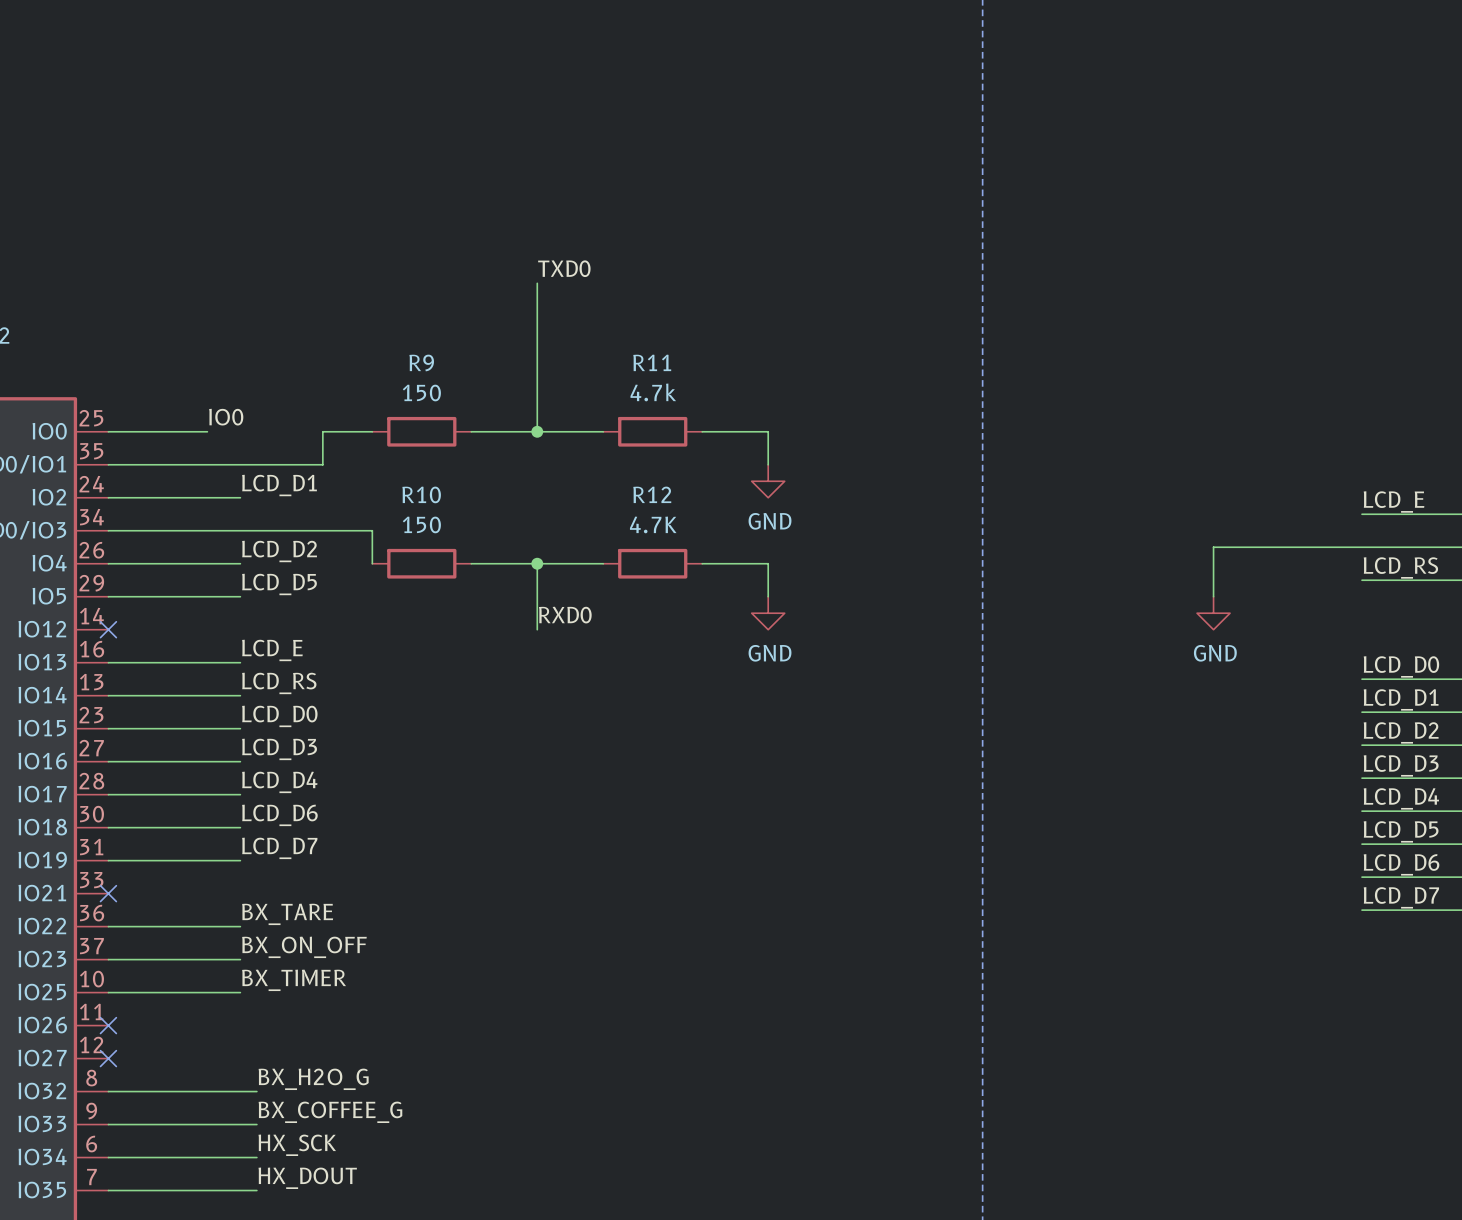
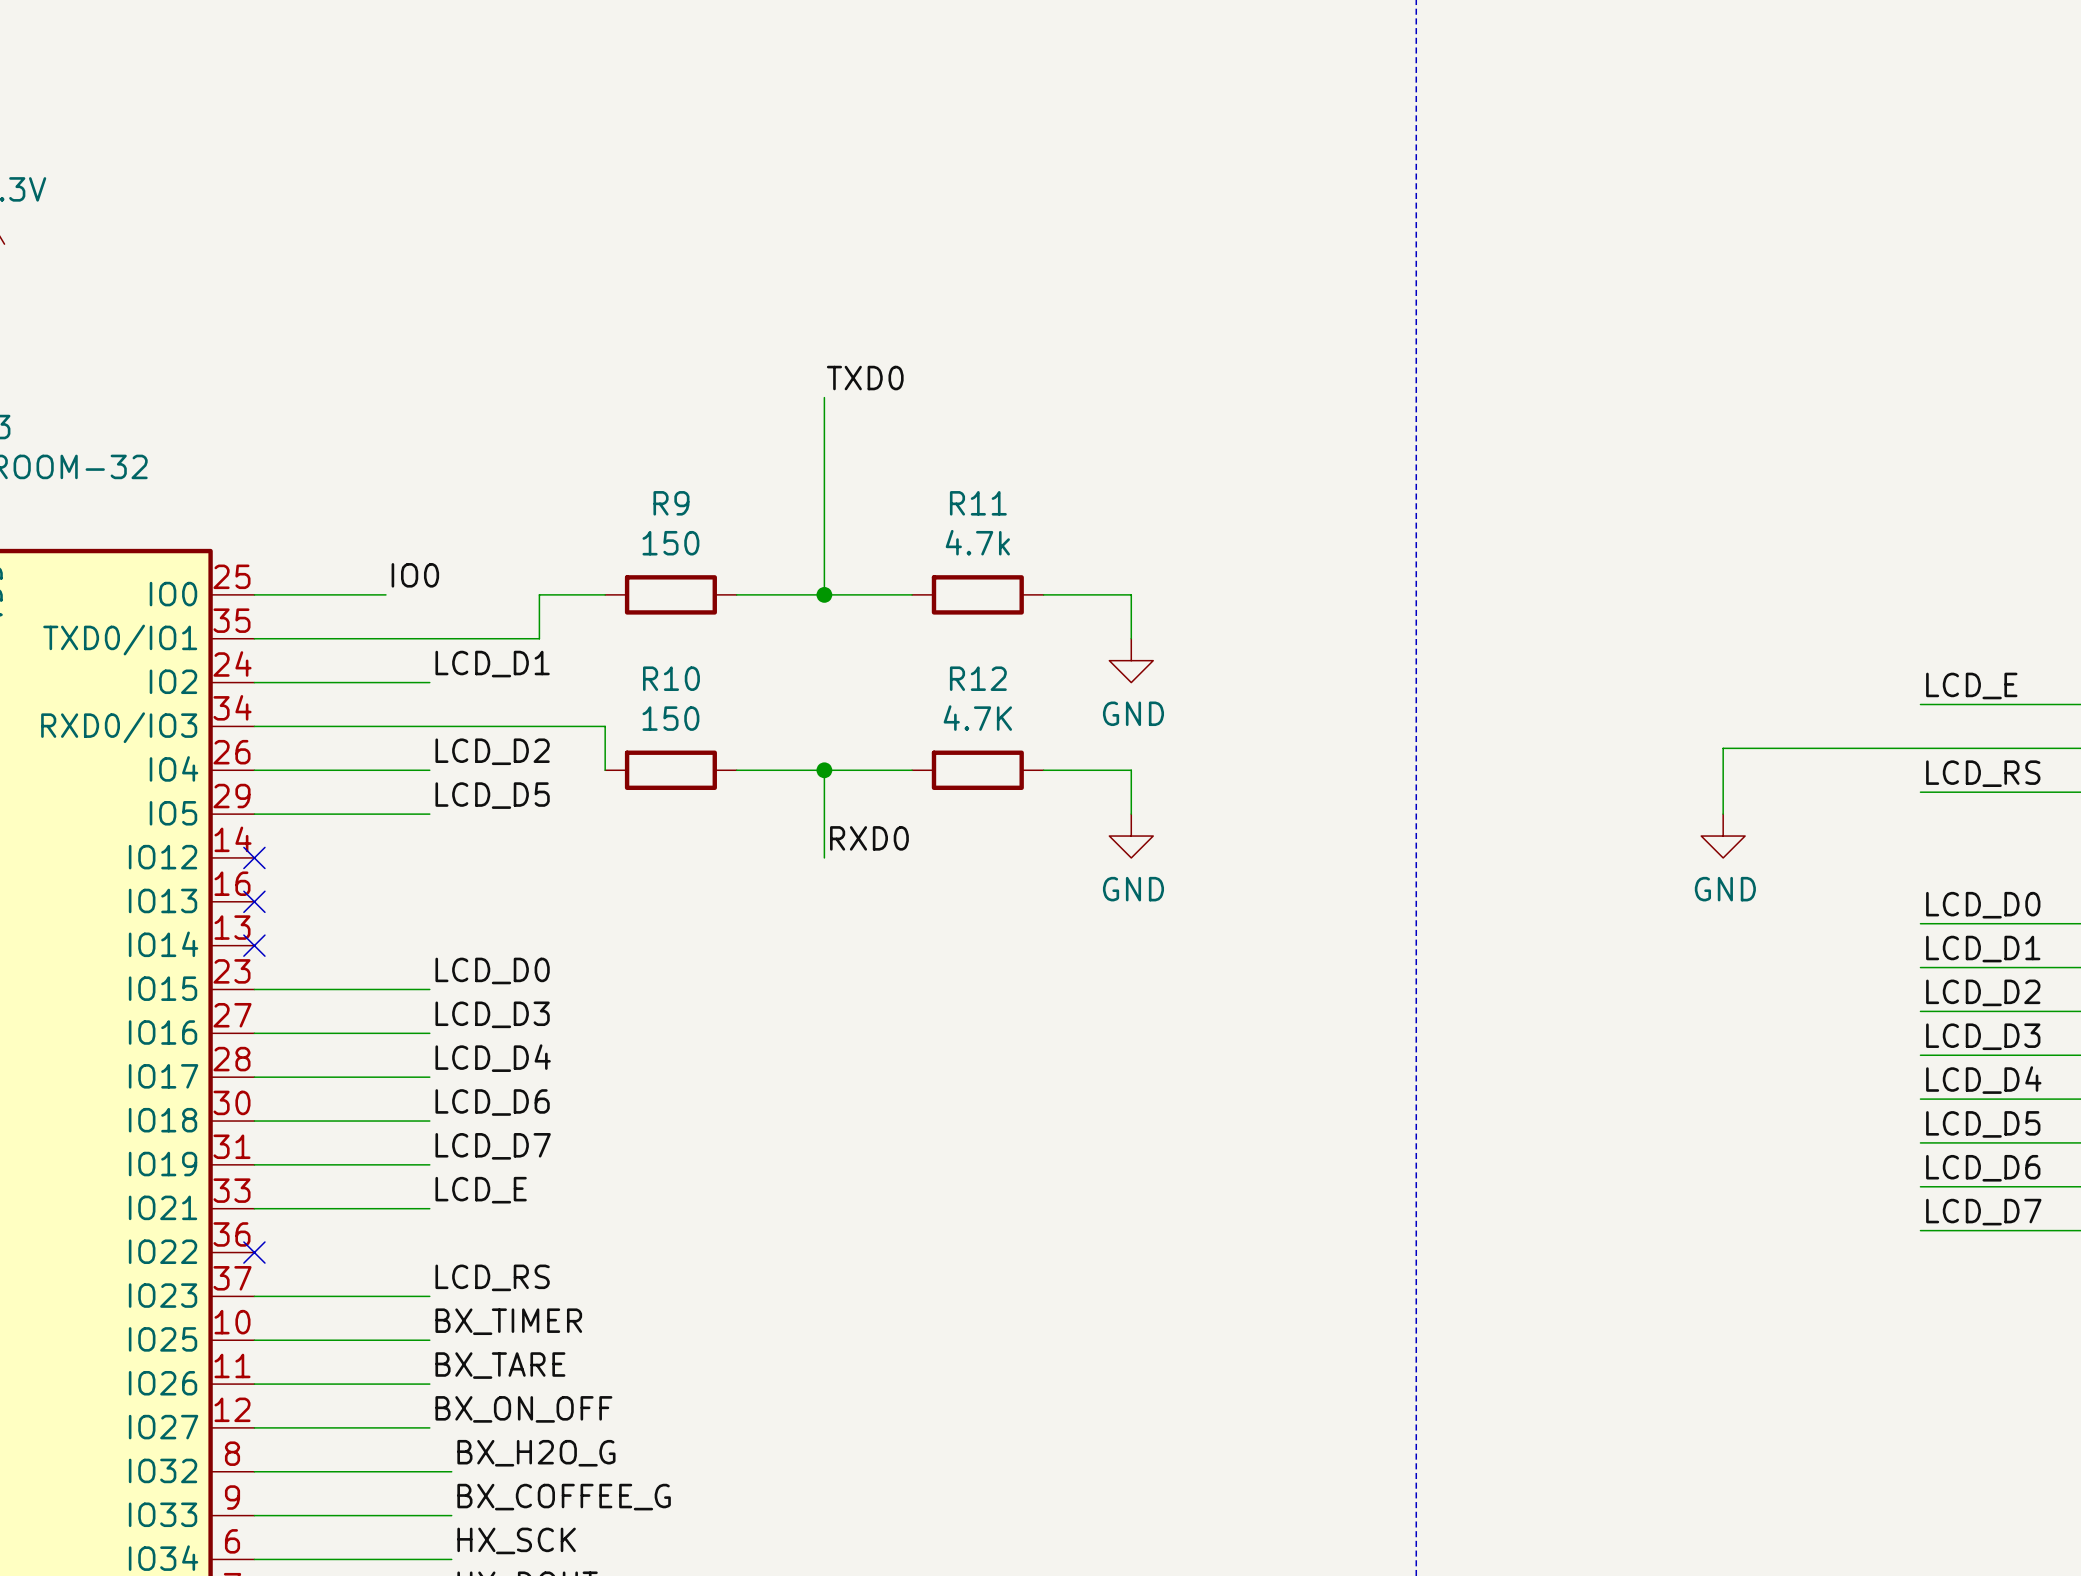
label position: LCD_E (272, 650) -> LCD_E (481, 1190)
wire: (108, 662) (240, 662) -> none
no-connect mark: none -> (254, 901)
label: LCD_RS (279, 683) -> none
wire: (108, 695) (240, 695) -> none
no-connect mark: none -> (254, 945)
no-connect mark position: (108, 893) -> (254, 1252)
label position: BX_TARE (287, 914) -> BX_TARE (500, 1365)
wire: (108, 926) (240, 926) -> (254, 1208) (429, 1208)
label: BX_ON_OFF (304, 947) -> LCD_RS (492, 1277)
wire: none -> (254, 1384) (429, 1384)
no-connect mark: (108, 1025) -> none
label: none -> BX_ON_OFF (523, 1409)
wire: none -> (254, 1427) (429, 1427)
no-connect mark: (108, 1058) -> none

